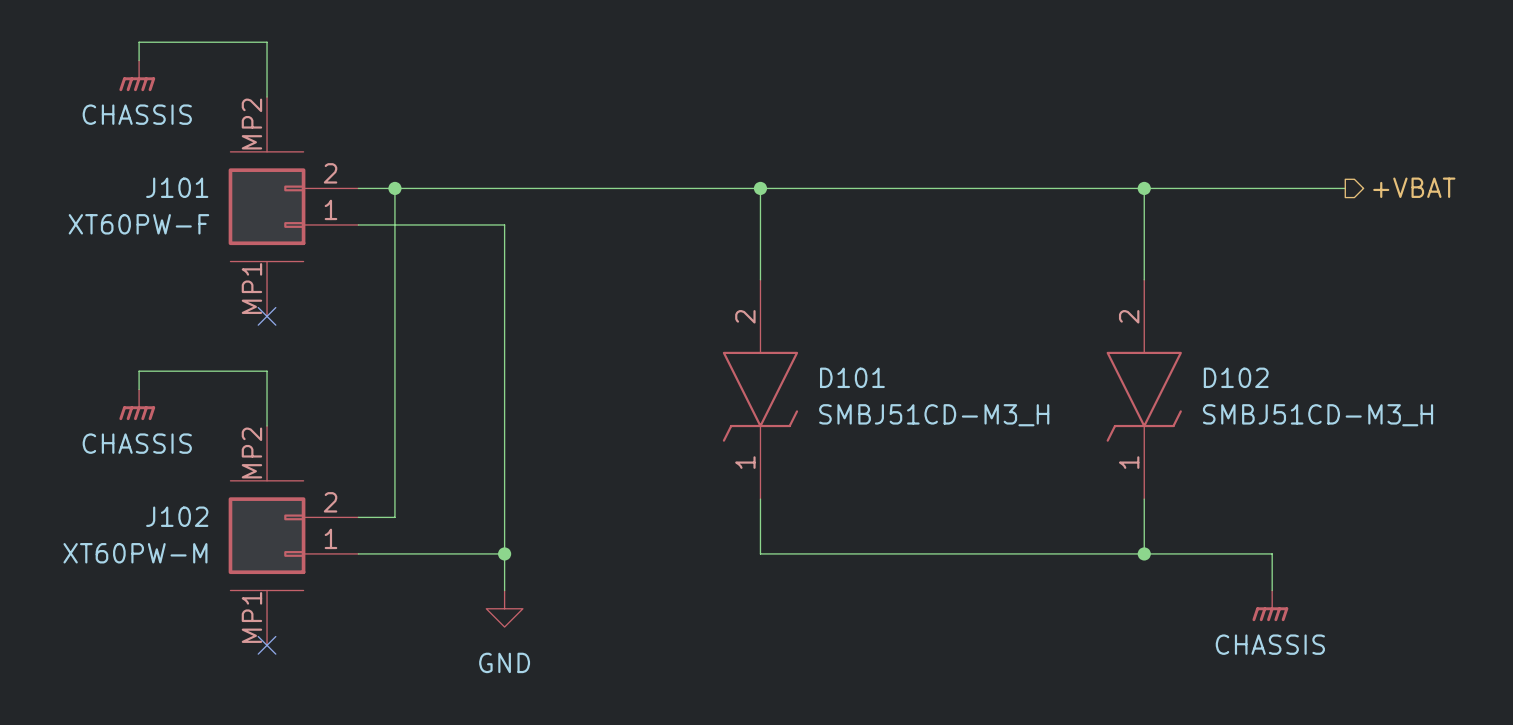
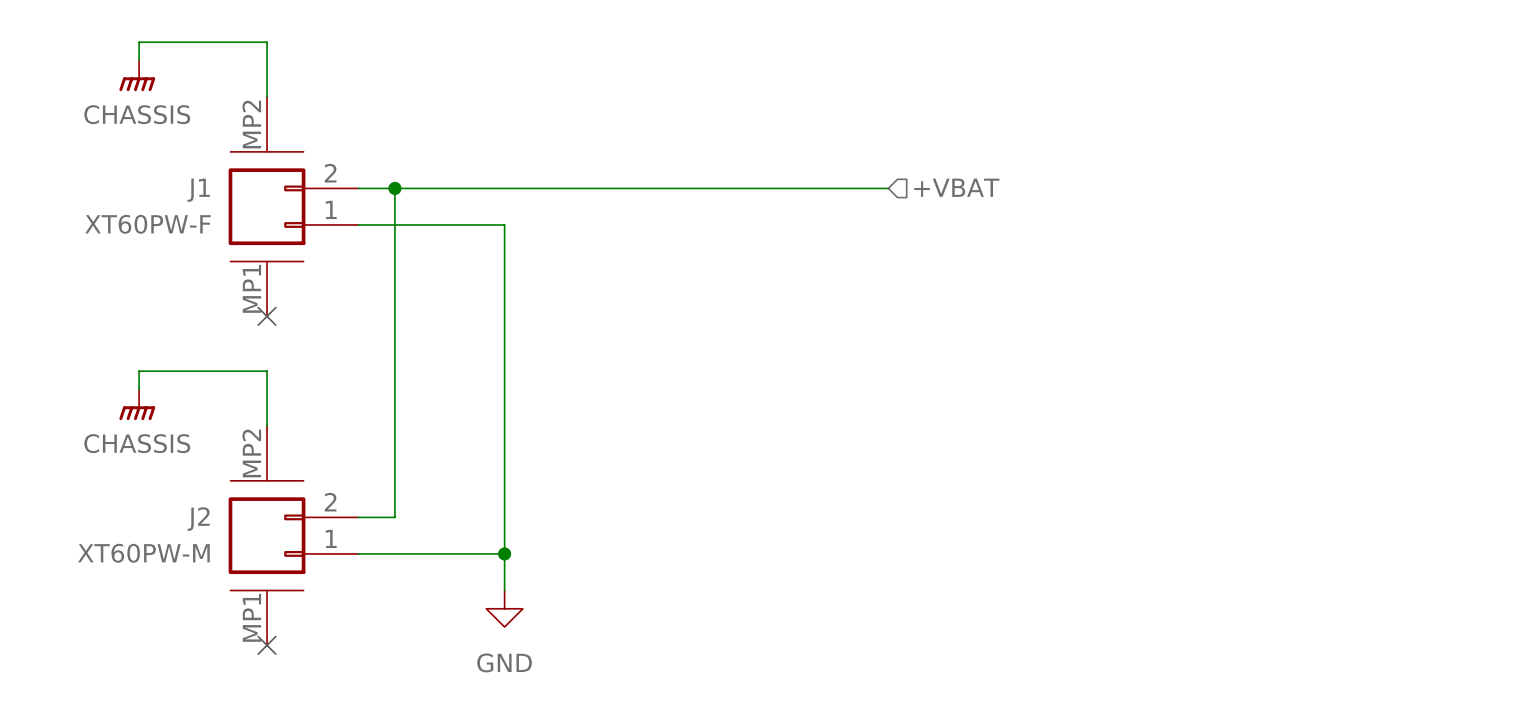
J101 name: J101 (177, 187) -> J1 (198, 190)
hierarchical label: none -> +VBAT (956, 187)
hierarchical label: +VBAT (1414, 187) -> none
wire: (760, 188) (760, 279) -> none
junction: (760, 188) -> none
wire: (888, 188) (1345, 188) -> none
wire: (1144, 188) (1144, 279) -> none
junction: (1144, 188) -> none
D101: SMBJ51CD-M3_H (760, 389) -> none
D102: SMBJ51CD-M3_H (1144, 389) -> none
wire: (760, 499) (760, 553) (1272, 553) (1272, 590) -> none
wire: (1144, 499) (1144, 553) -> none
J102 name: J102 (177, 516) -> J2 (198, 519)
junction: (1144, 553) -> none
power symbol: CHASSIS (1270, 605) -> none

